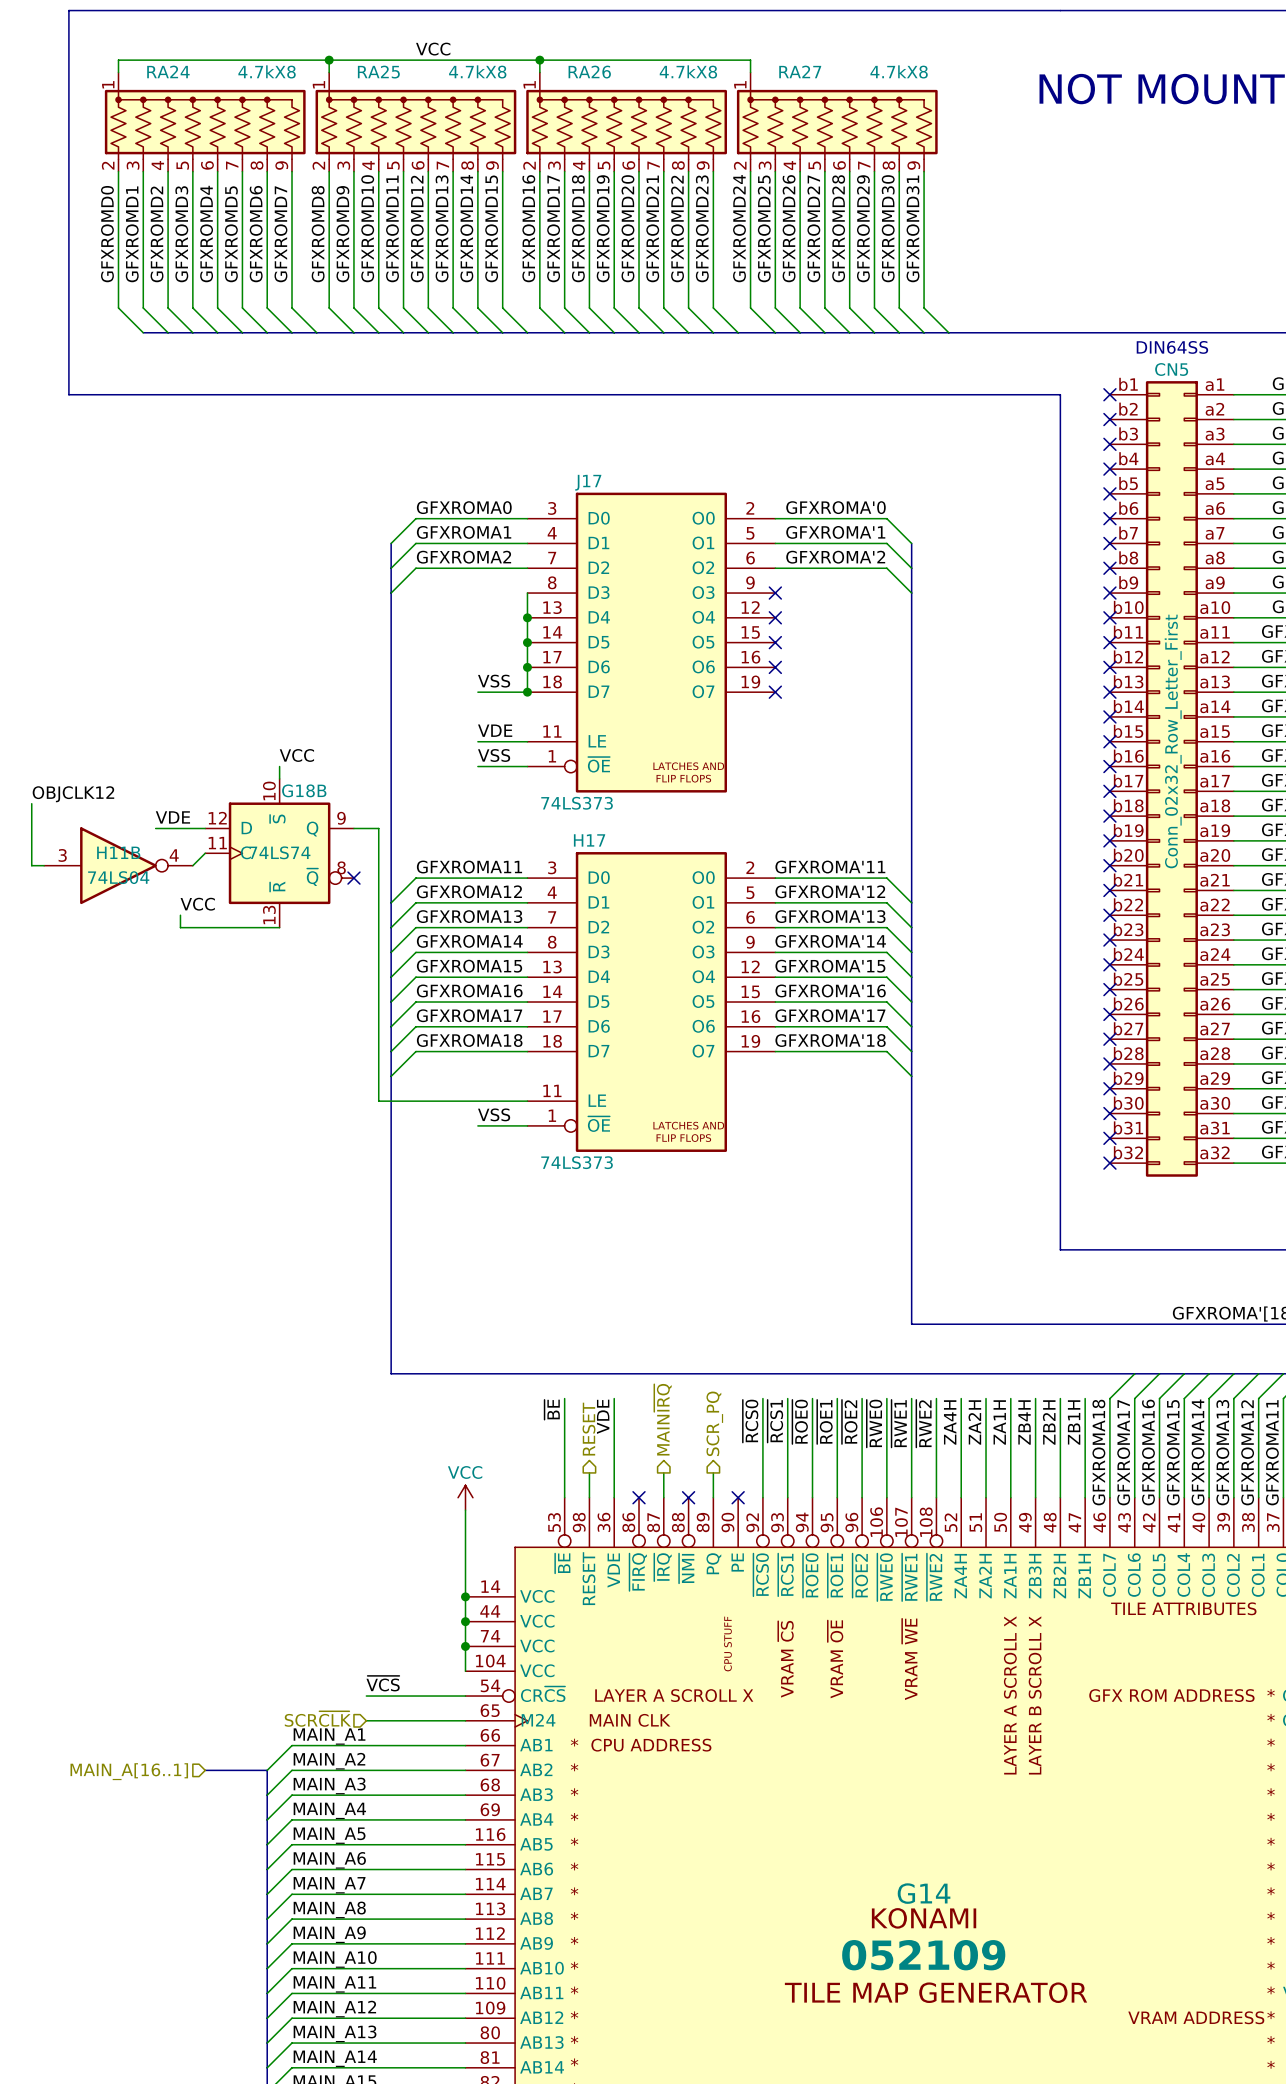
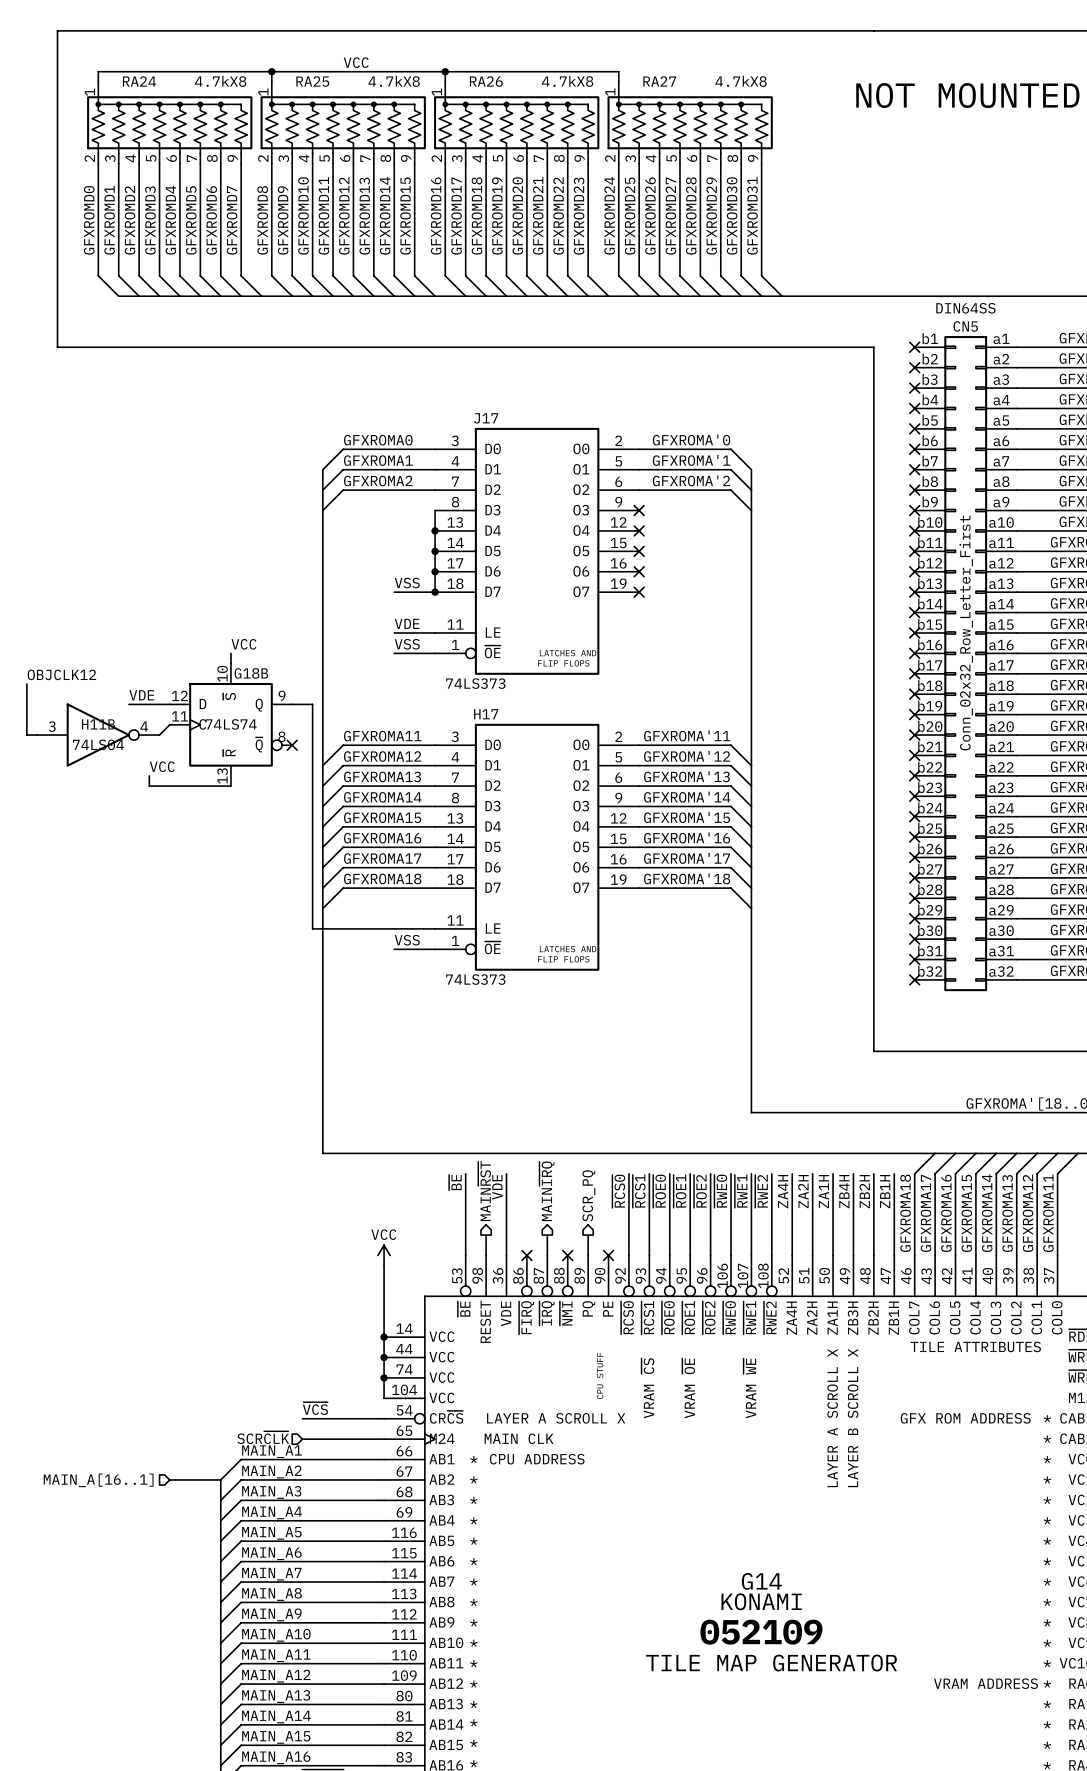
hierarchical label: RESET (588, 1429) -> MAIN~{RST} (484, 1191)

